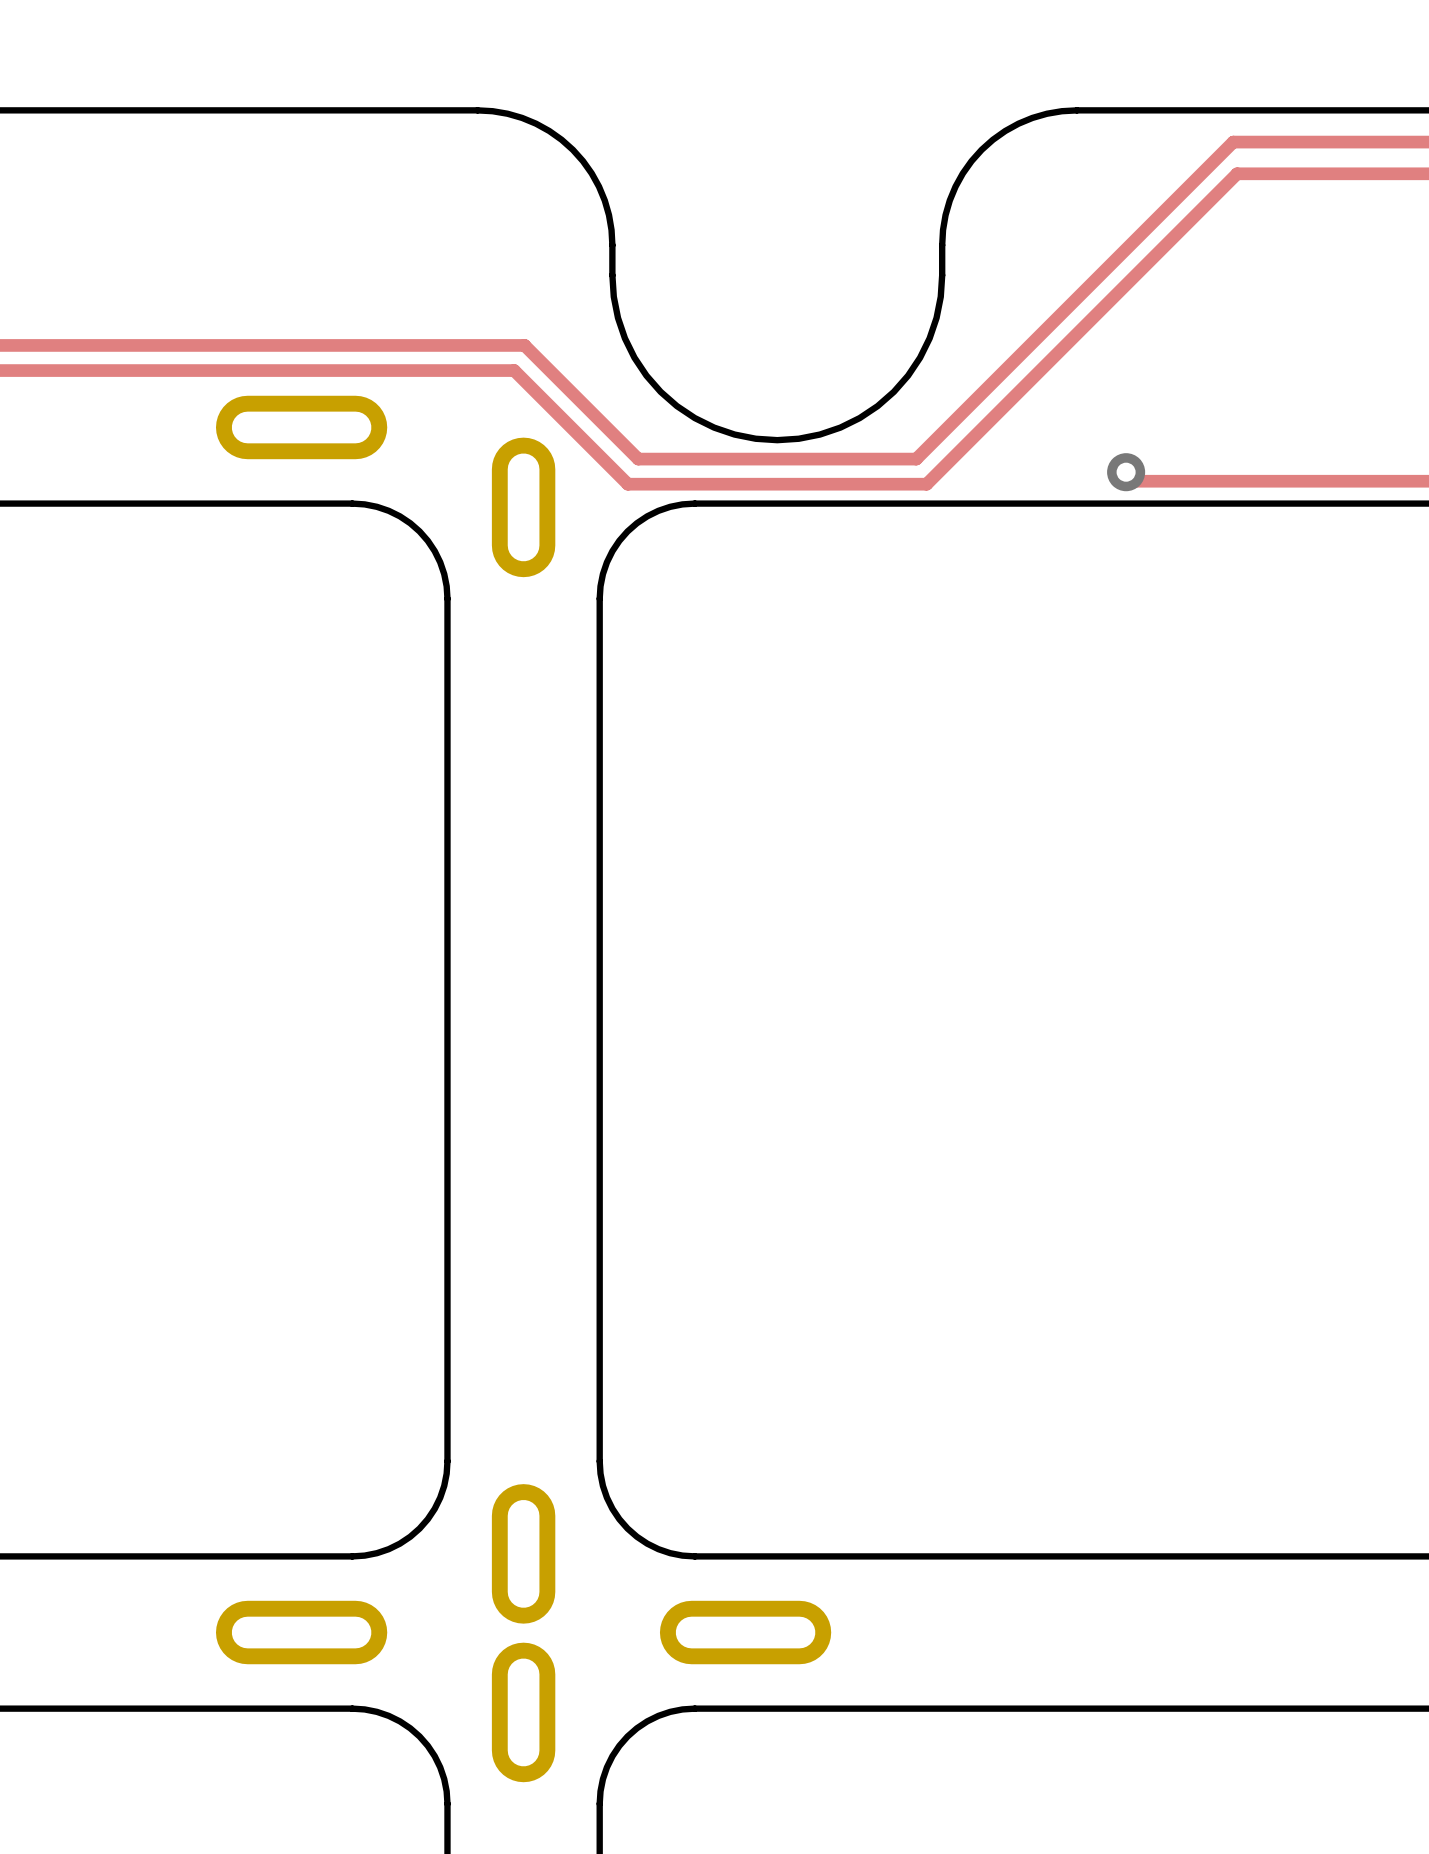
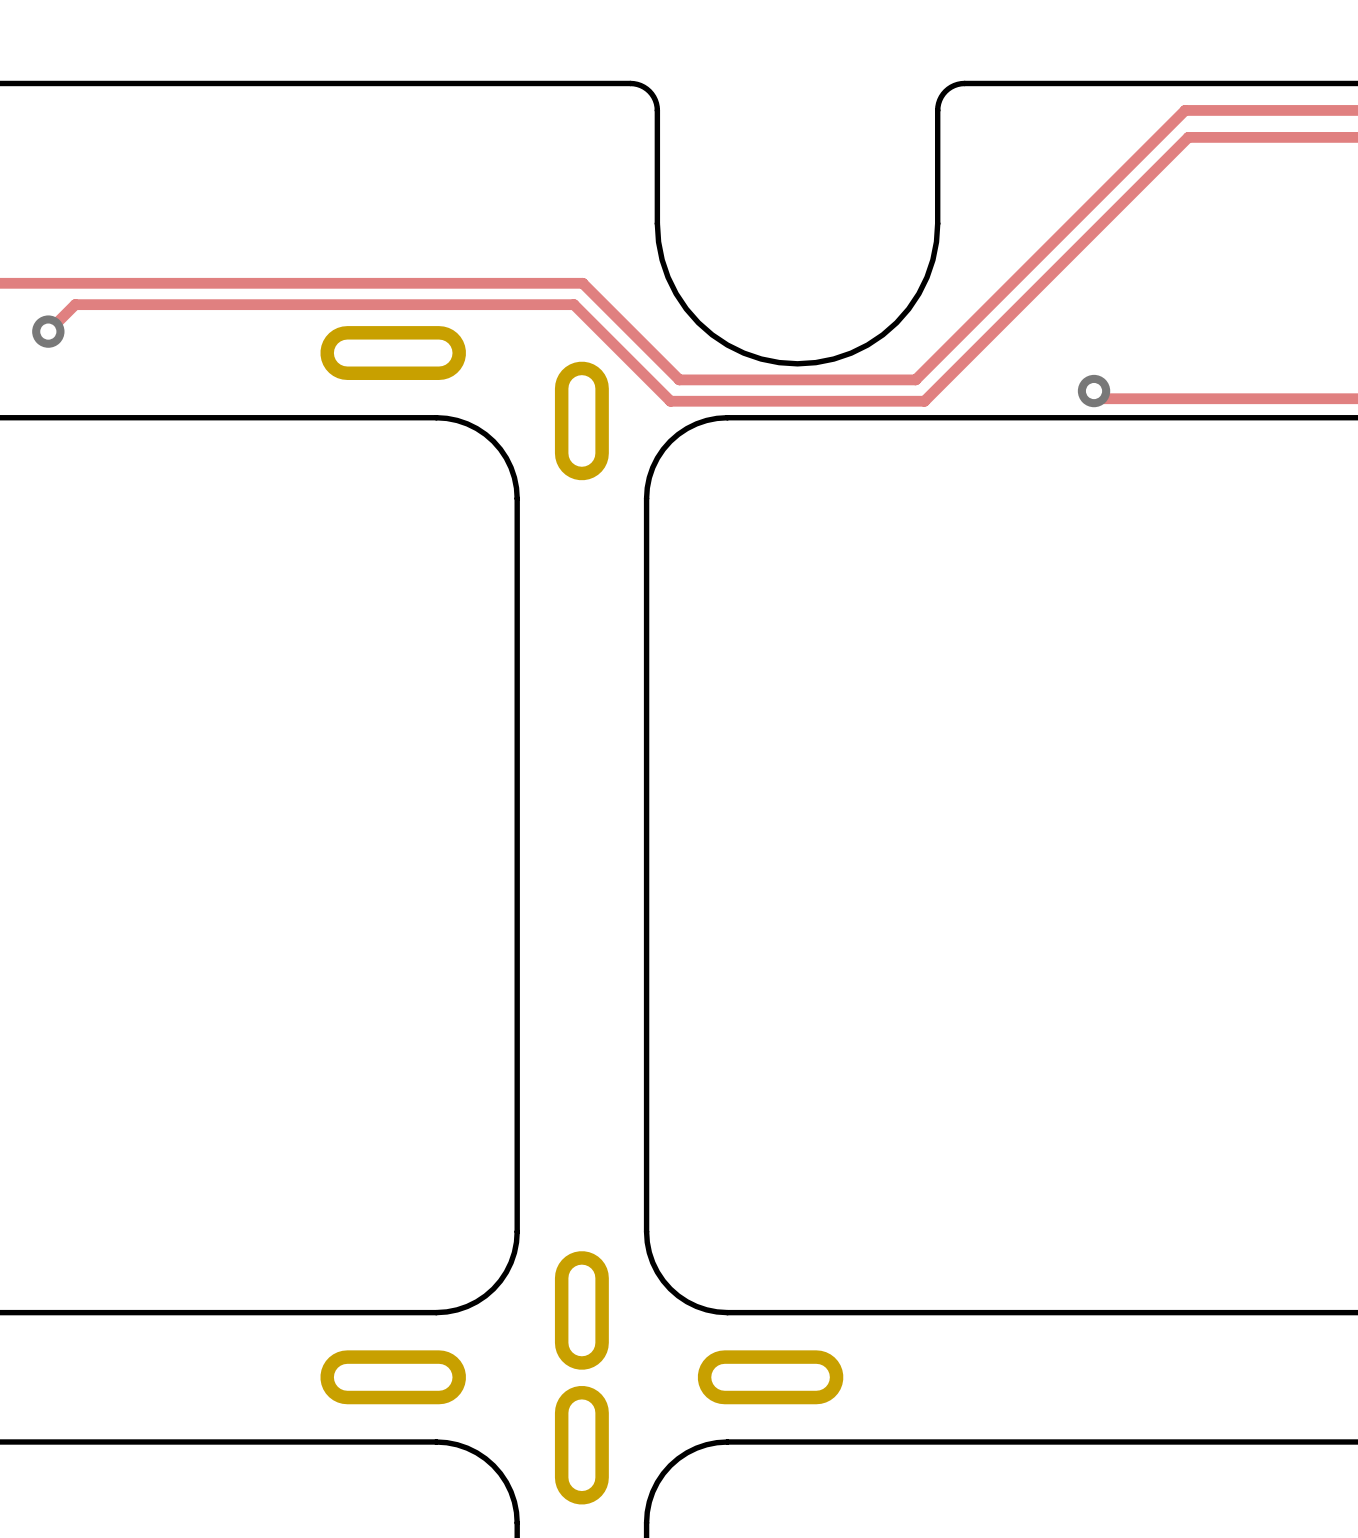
board edge: (477, 110) (492, 111) (522, 117) (549, 131) (572, 149) (591, 173) (599, 186) (609, 215) (612, 245) -> (542, 83) (633, 83) (649, 91) (657, 106) (657, 198)
board edge: (1076, 110) (1046, 113) (1018, 123) (1005, 131) (981, 149) (962, 173) (949, 200) (945, 215) (942, 245) -> (1052, 83) (961, 83) (945, 91) (937, 106) (937, 198)

